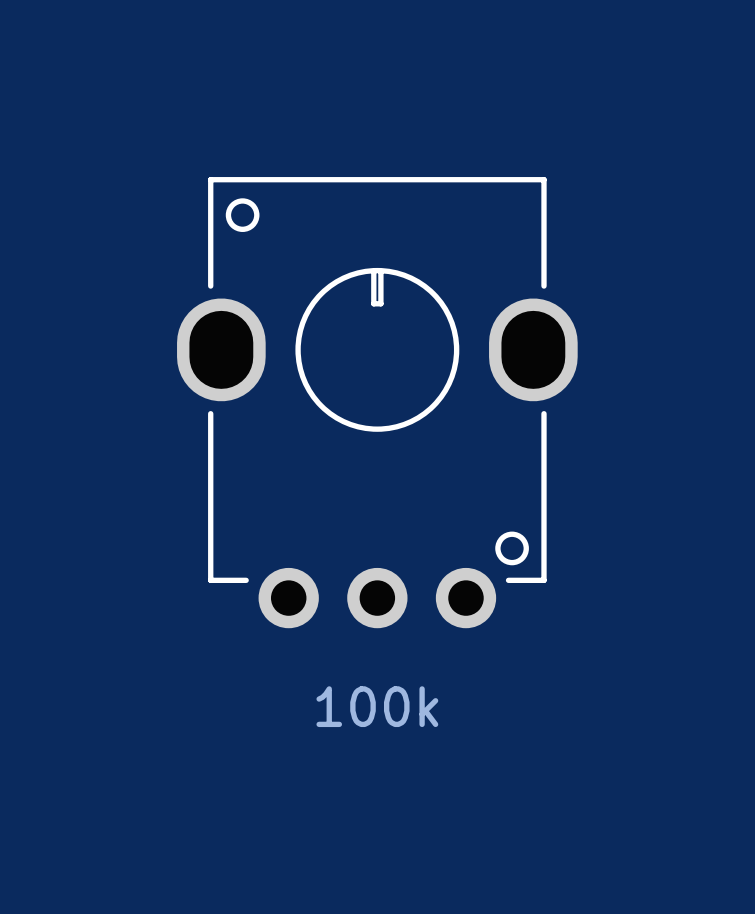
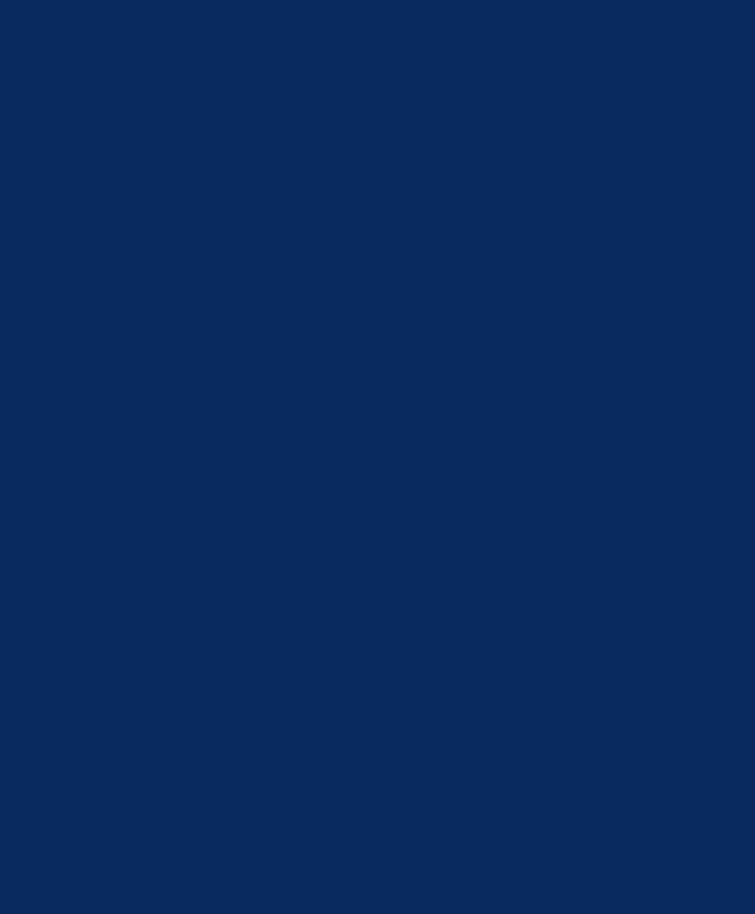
part: 100k (377, 402) -> none

